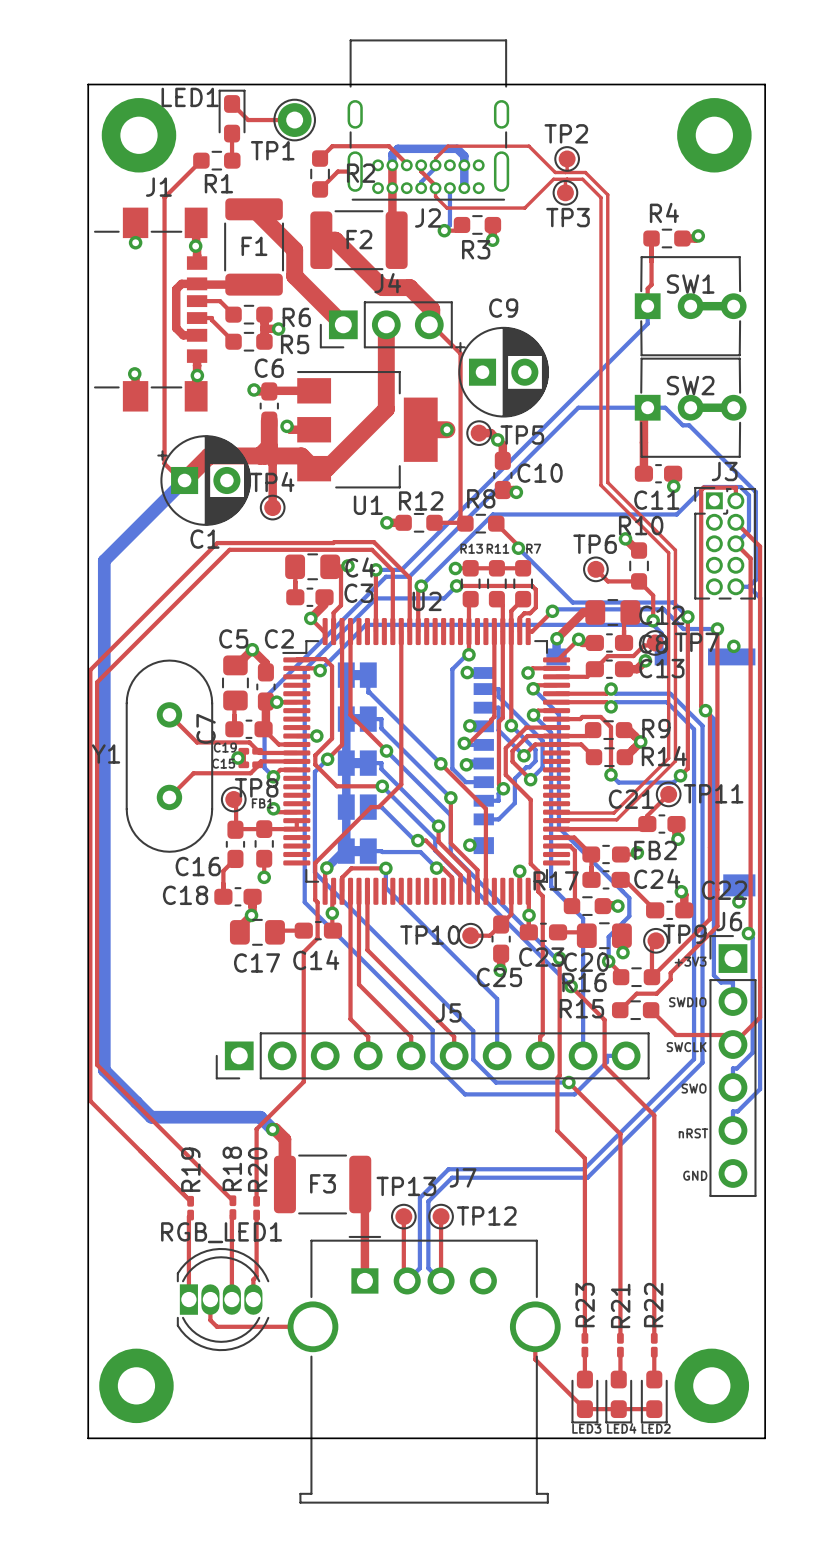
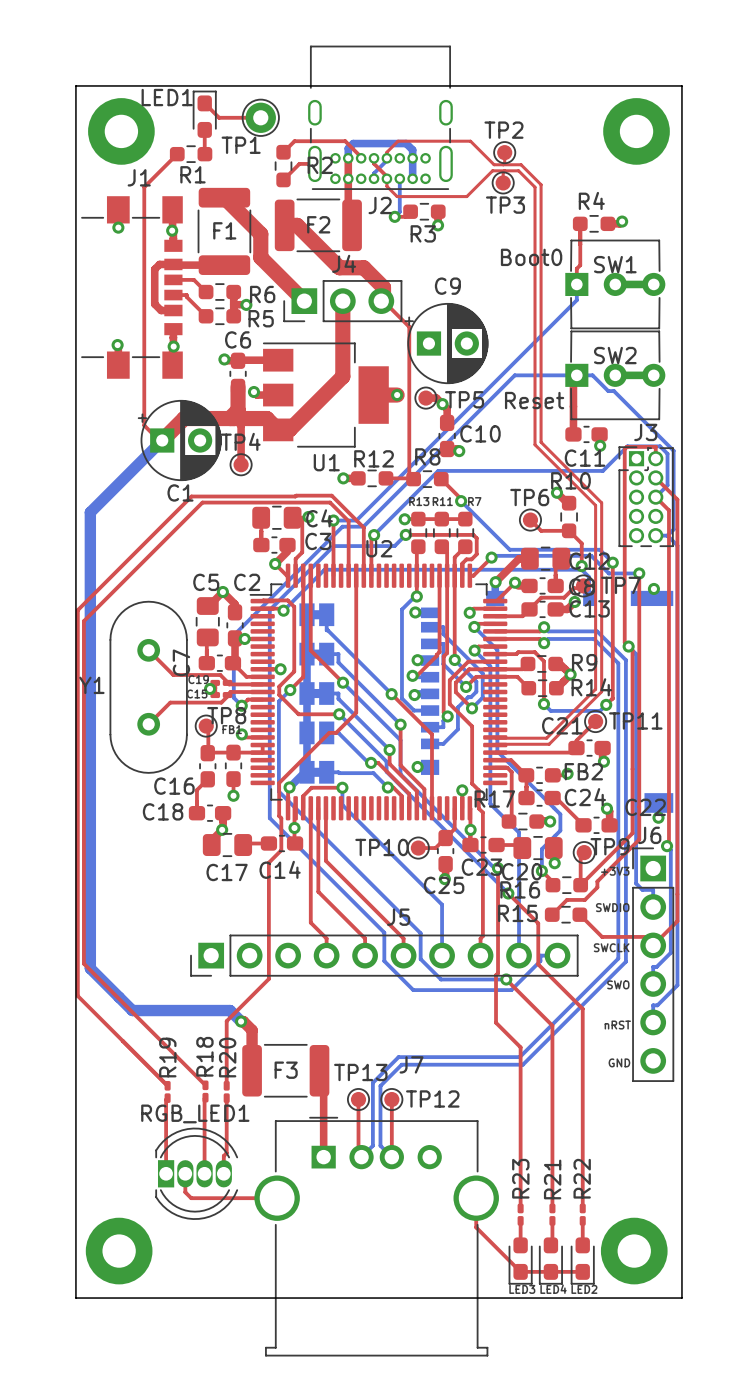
SW1 value: none -> Boot0 (531, 257)
SW2 value: none -> Reset (534, 400)

